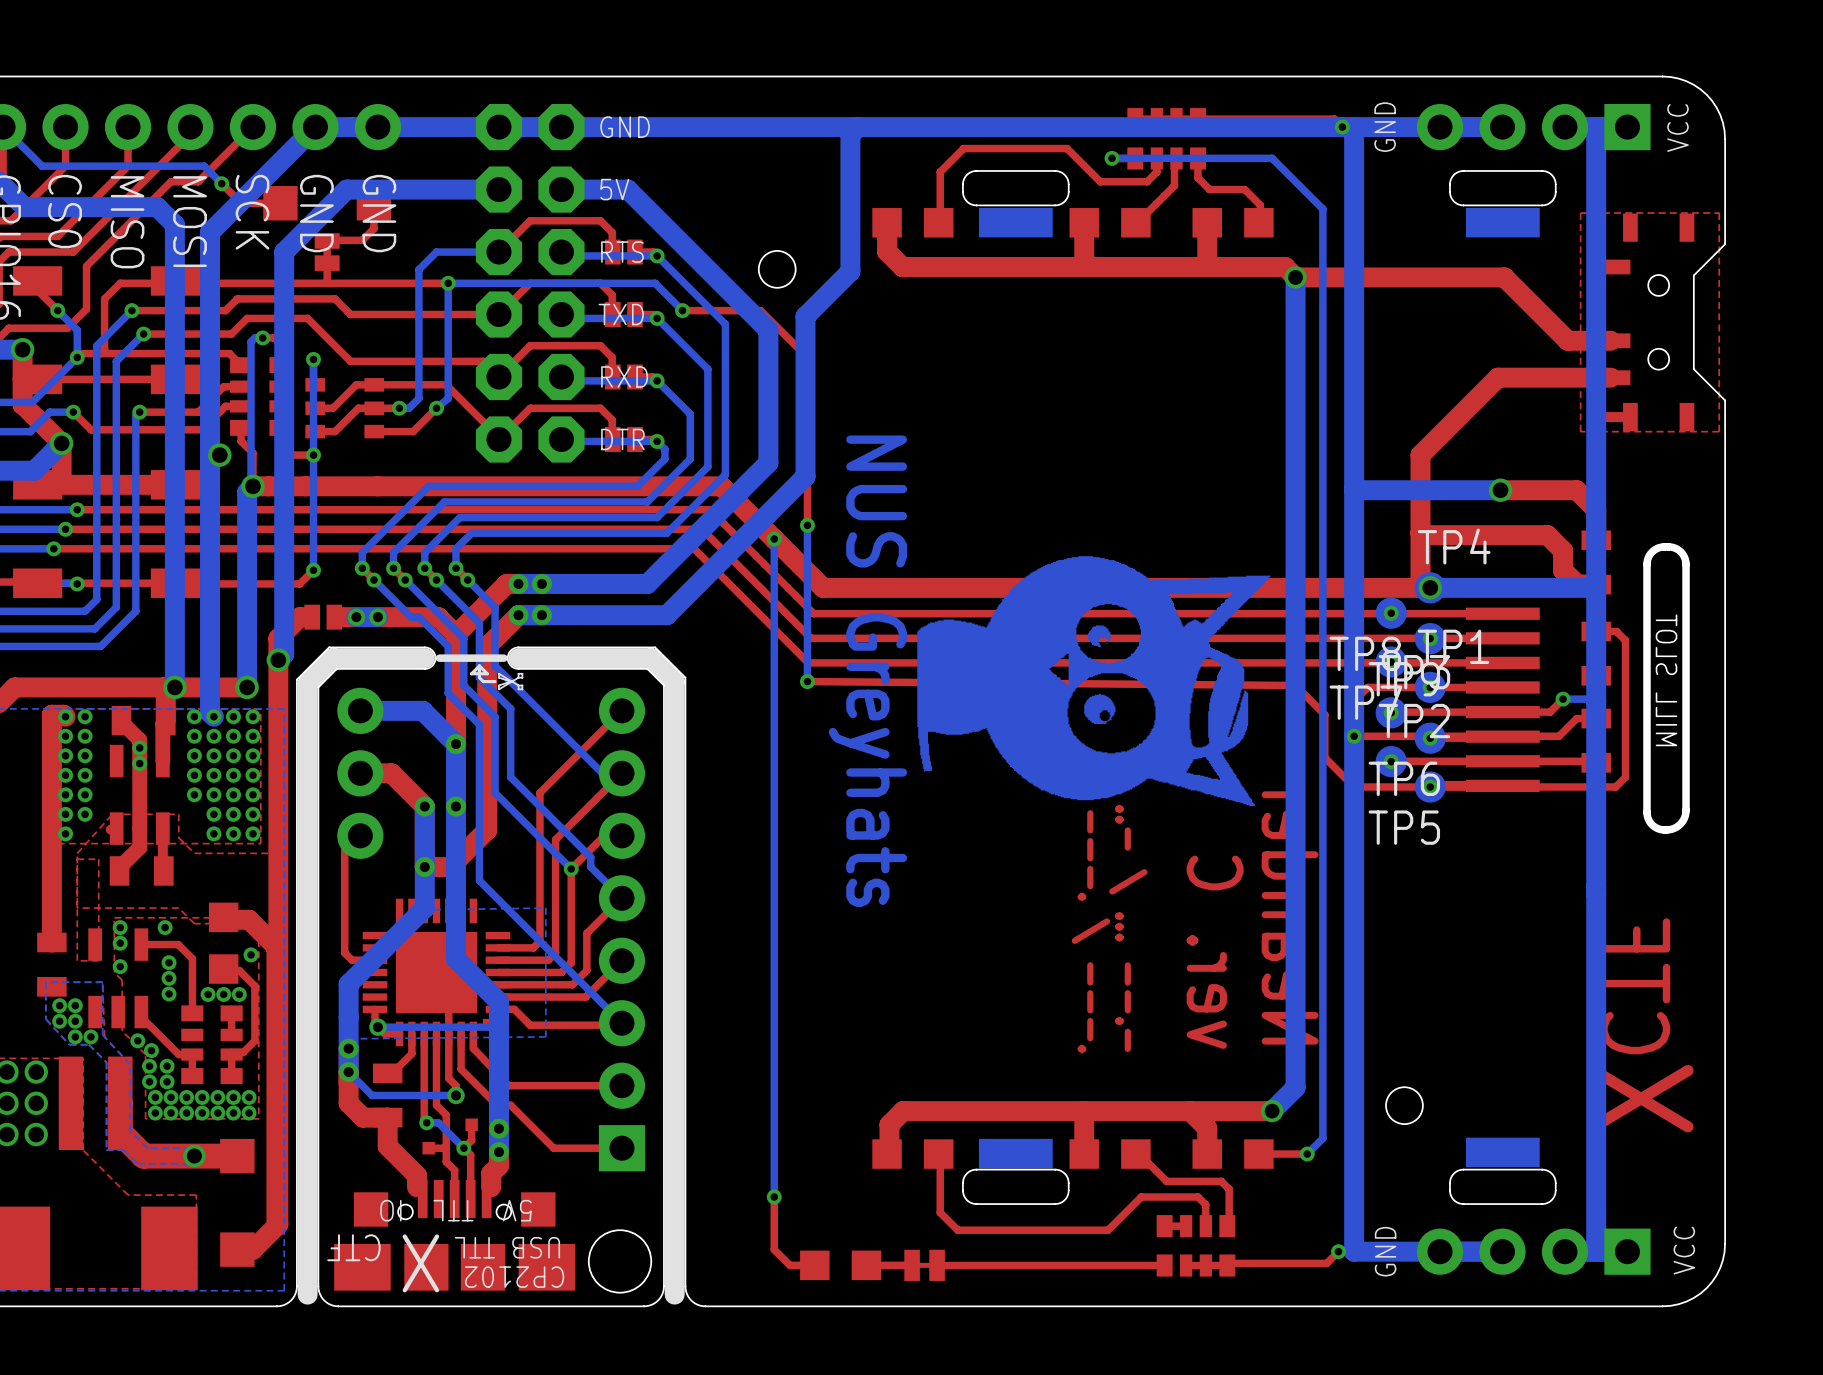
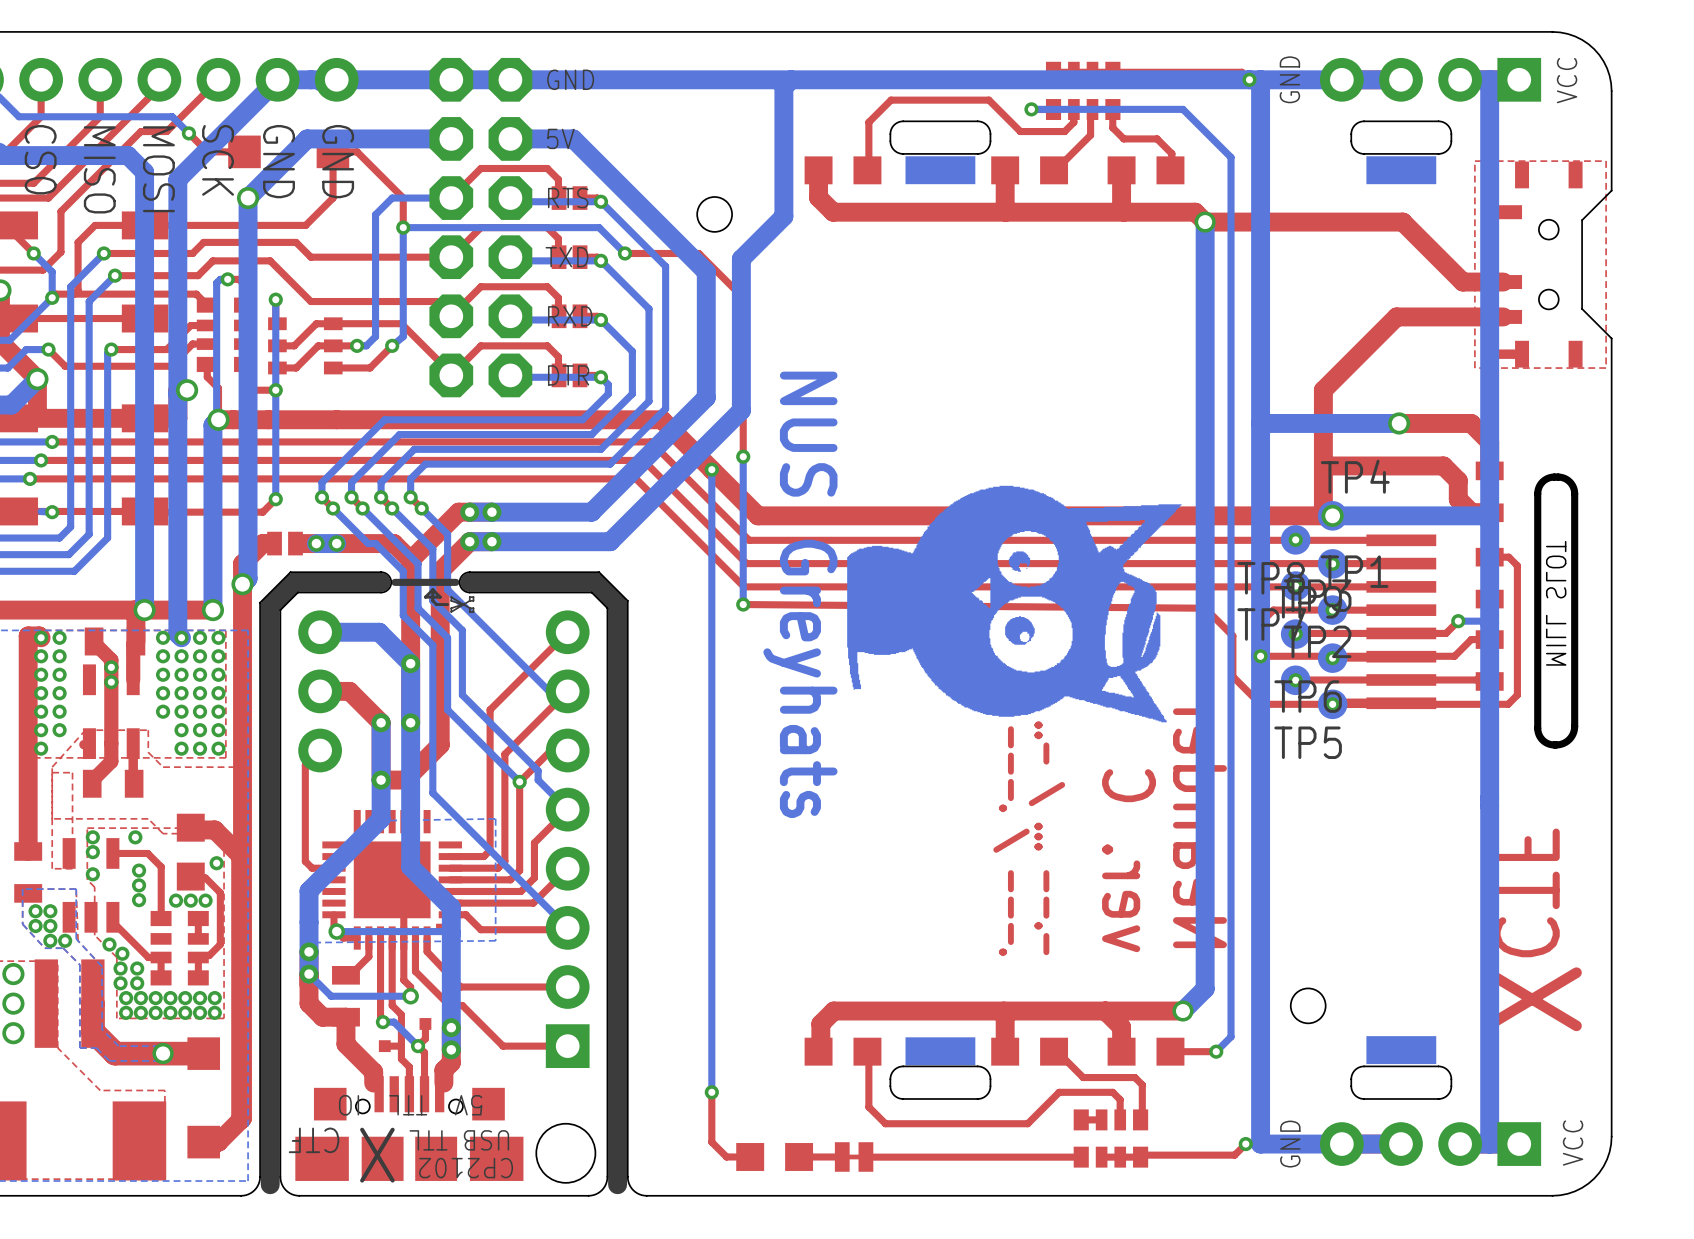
top track: none -> (332, 151) (357, 151) (403, 198) (403, 227)
top track: (373, 228) (362, 240) (327, 240) (327, 283) -> none
via: none -> (248, 198)
part: (327, 252) -> none
top track: (448, 283) (120, 283) -> (332, 176) (333, 198) (305, 225) (95, 225) (92, 227)

